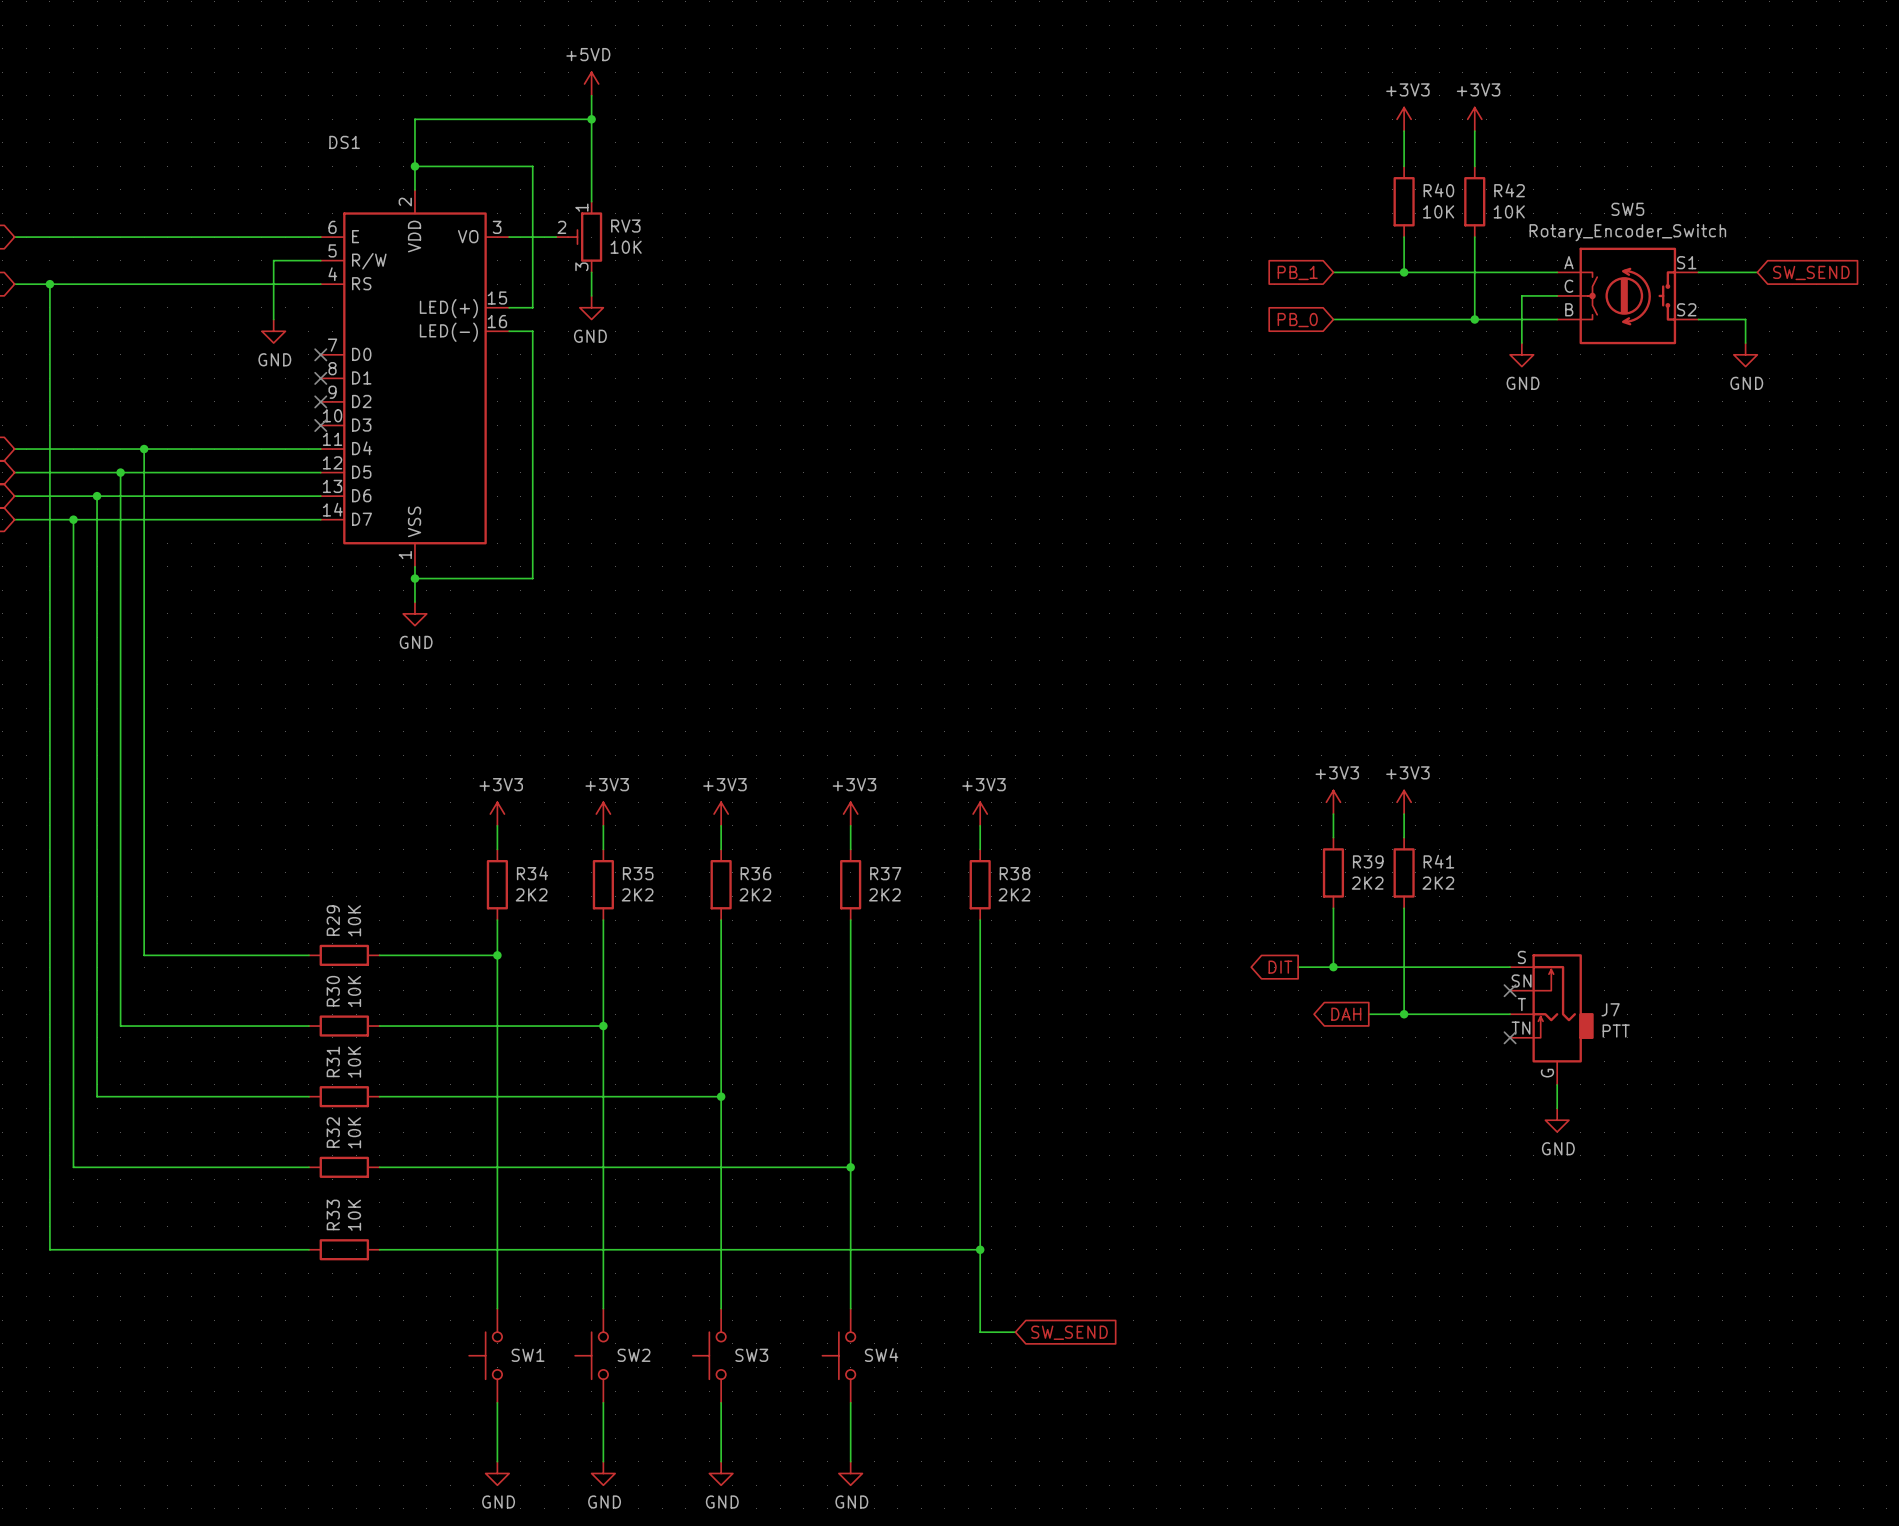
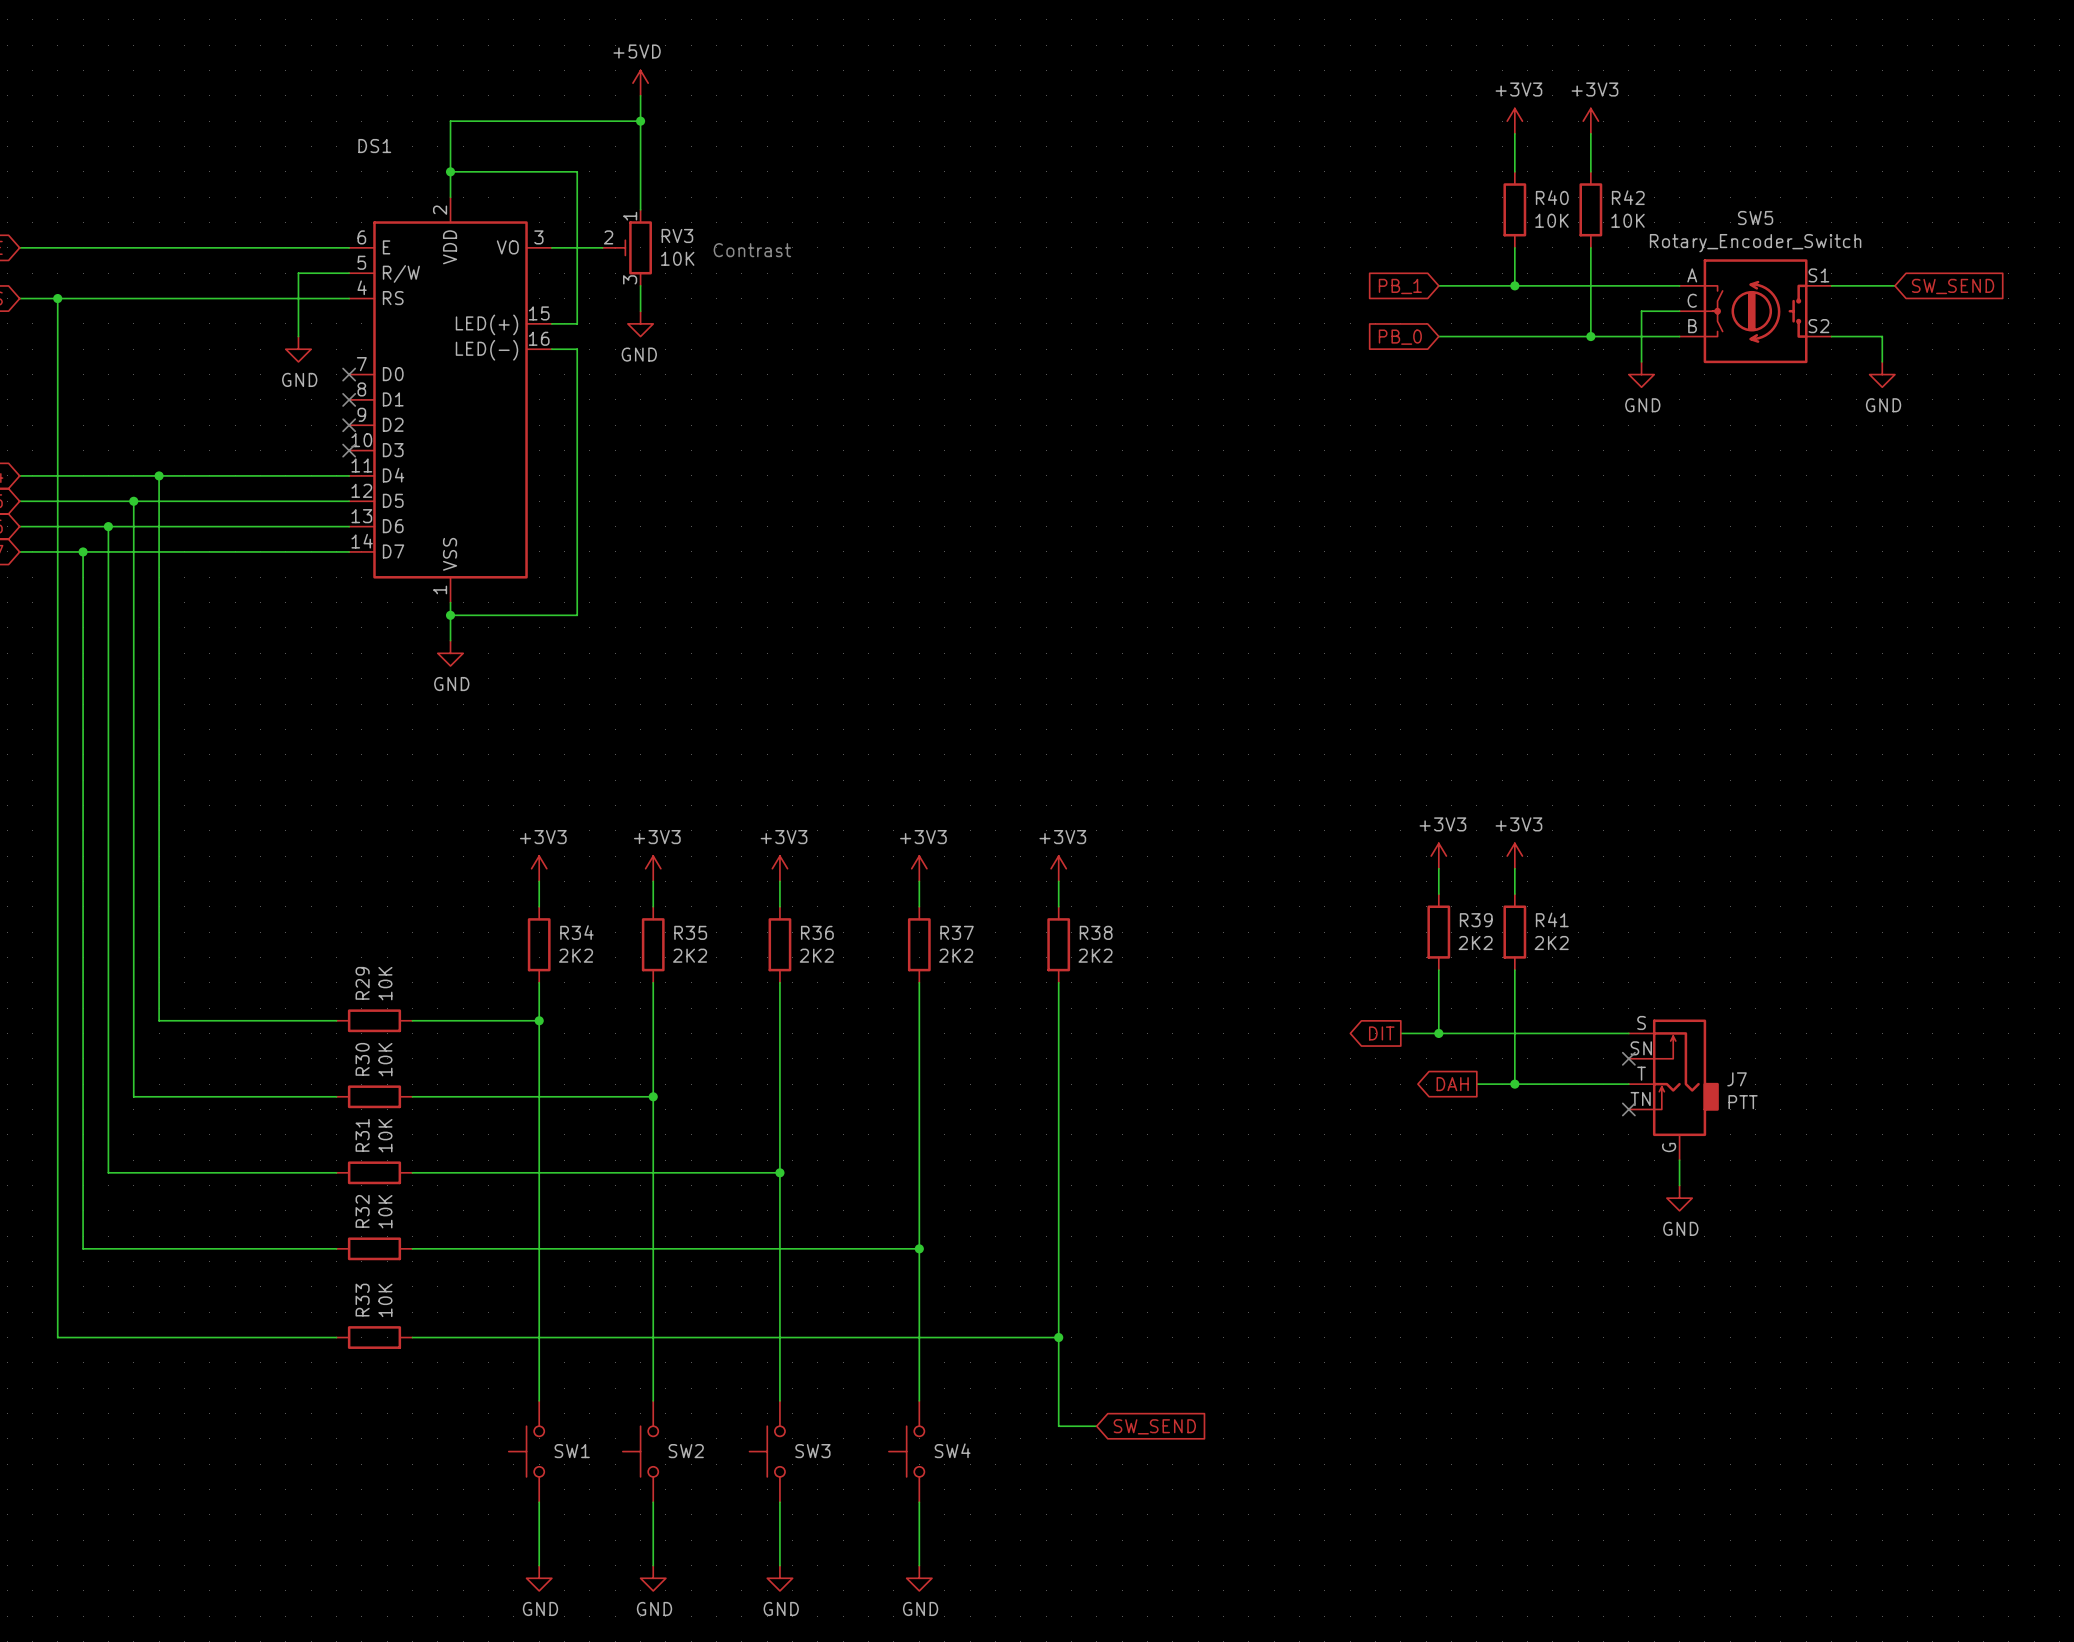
text: none -> Contrast (752, 250)

